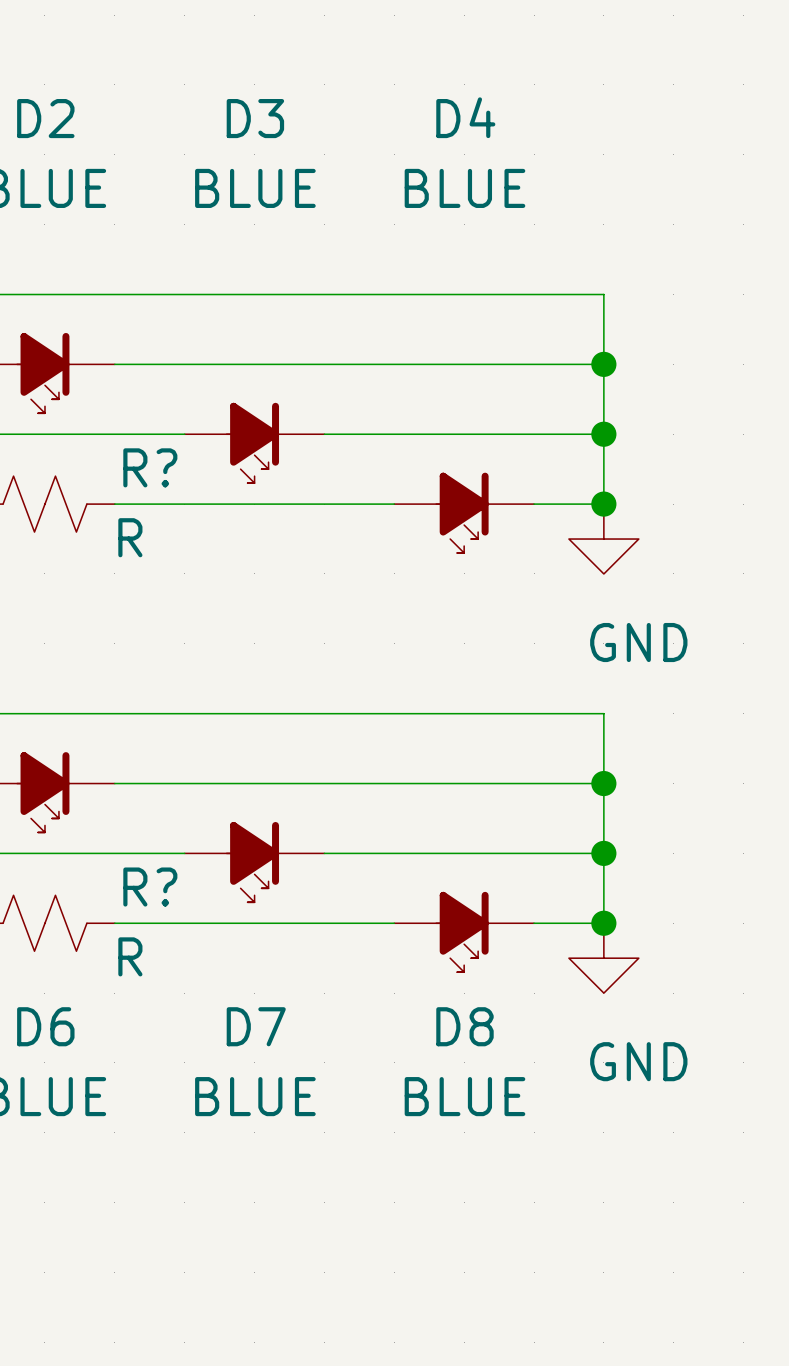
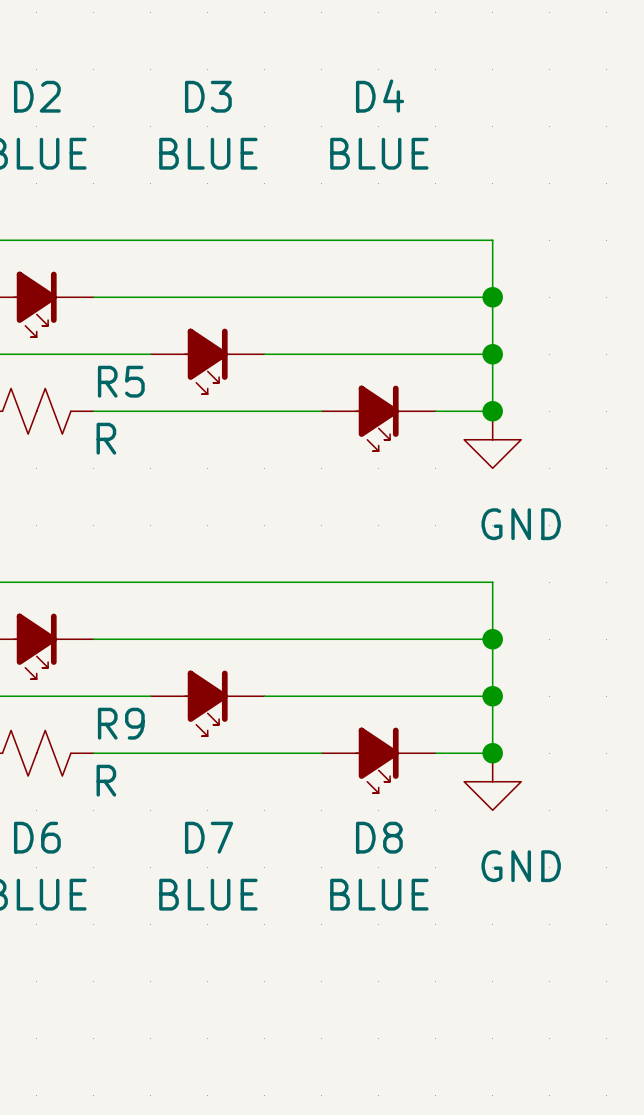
R? name: R? (150, 467) -> R5 (121, 381)
R? name: R? (150, 887) -> R9 (121, 723)

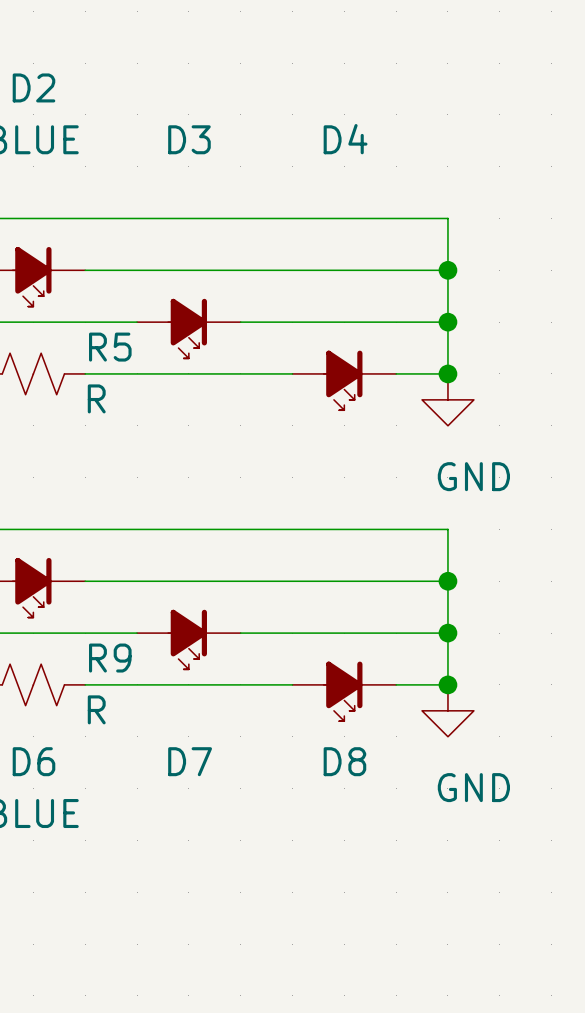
D3 name position: D3 (208, 96) -> D3 (189, 139)
D4 name position: D4 (380, 96) -> D4 (345, 139)
D3 value: BLUE (208, 153) -> none
D4 value: BLUE (379, 153) -> none
D7 value: BLUE (208, 894) -> none
D8 value: BLUE (379, 894) -> none

